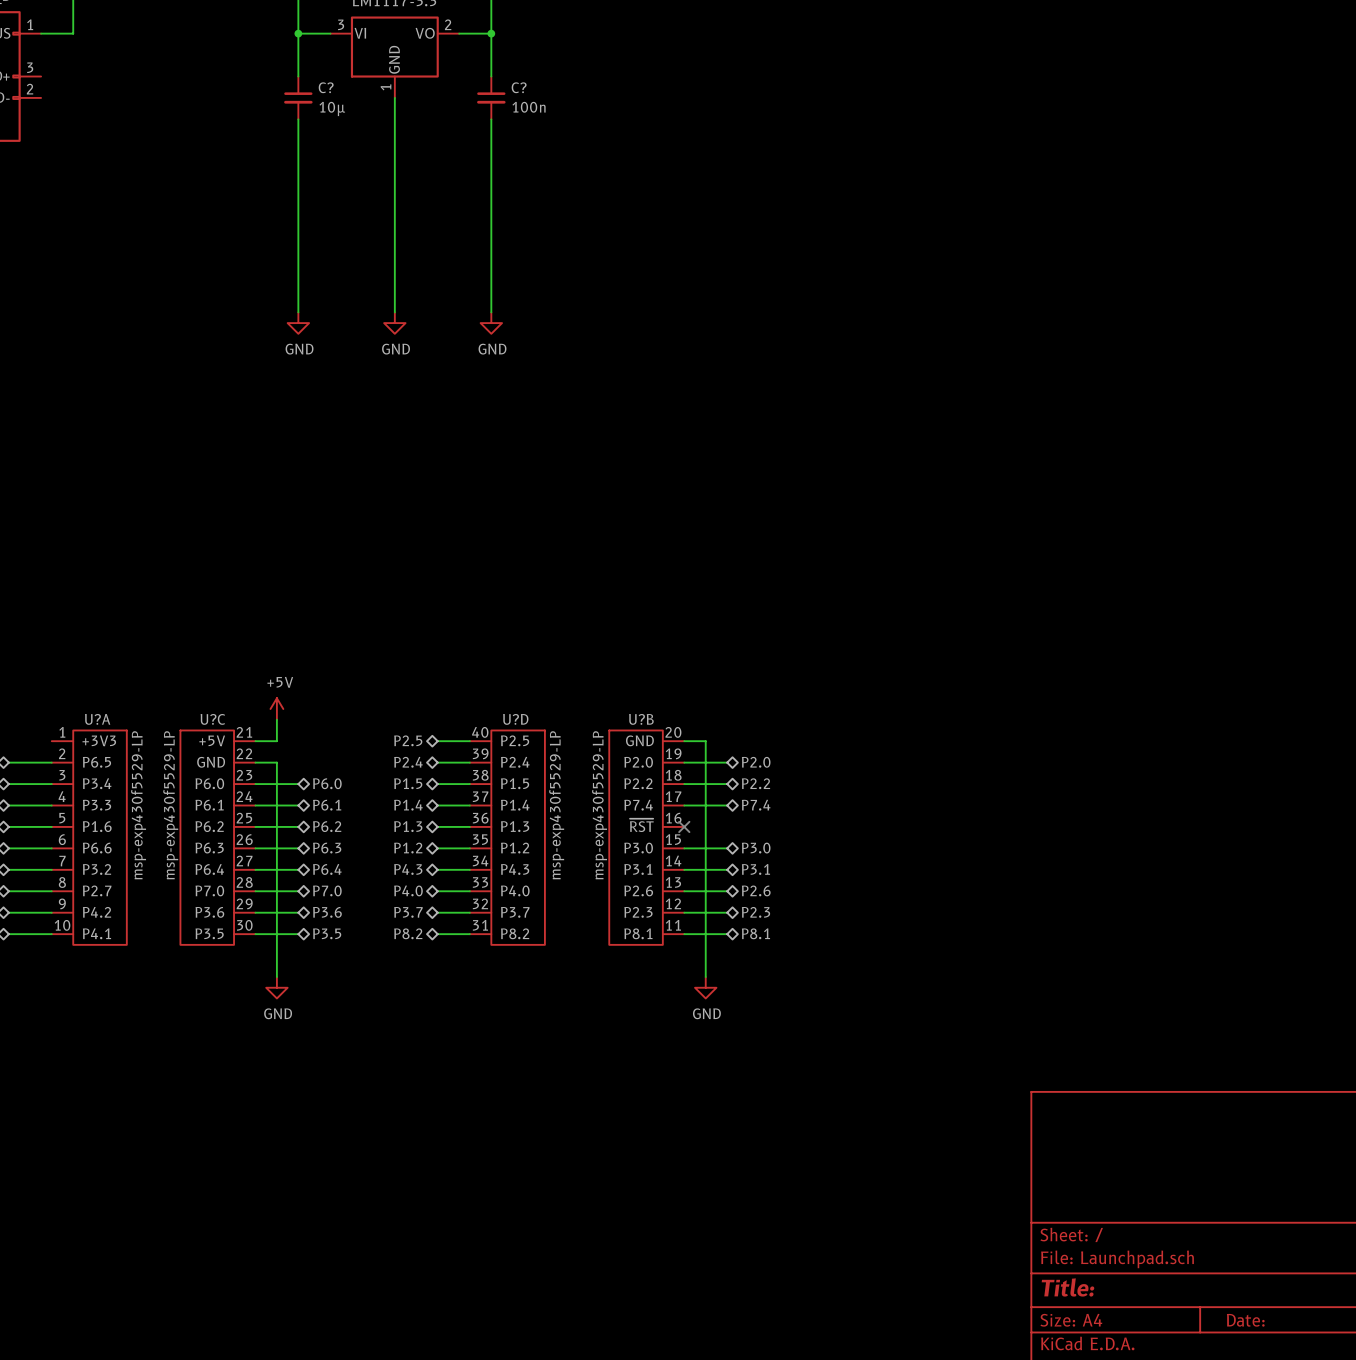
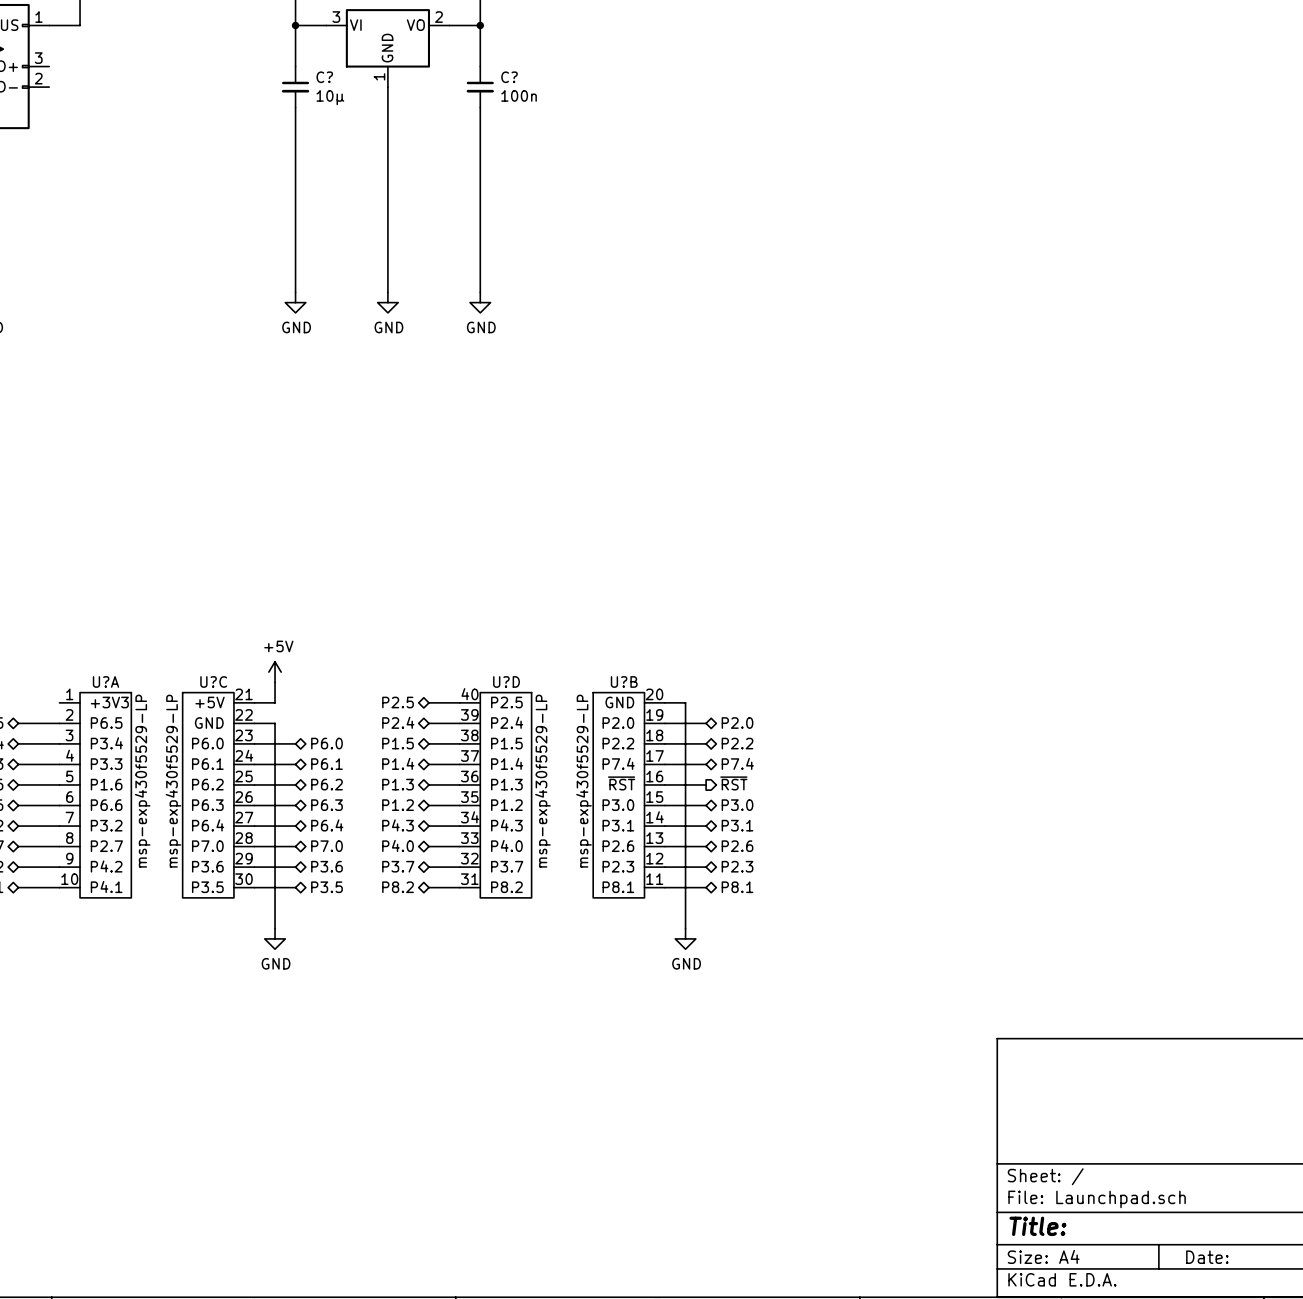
hierarchical label: none -> ~{RST} (733, 783)
wire: none -> (665, 784) (706, 784)
no-connect mark: (684, 826) -> none

